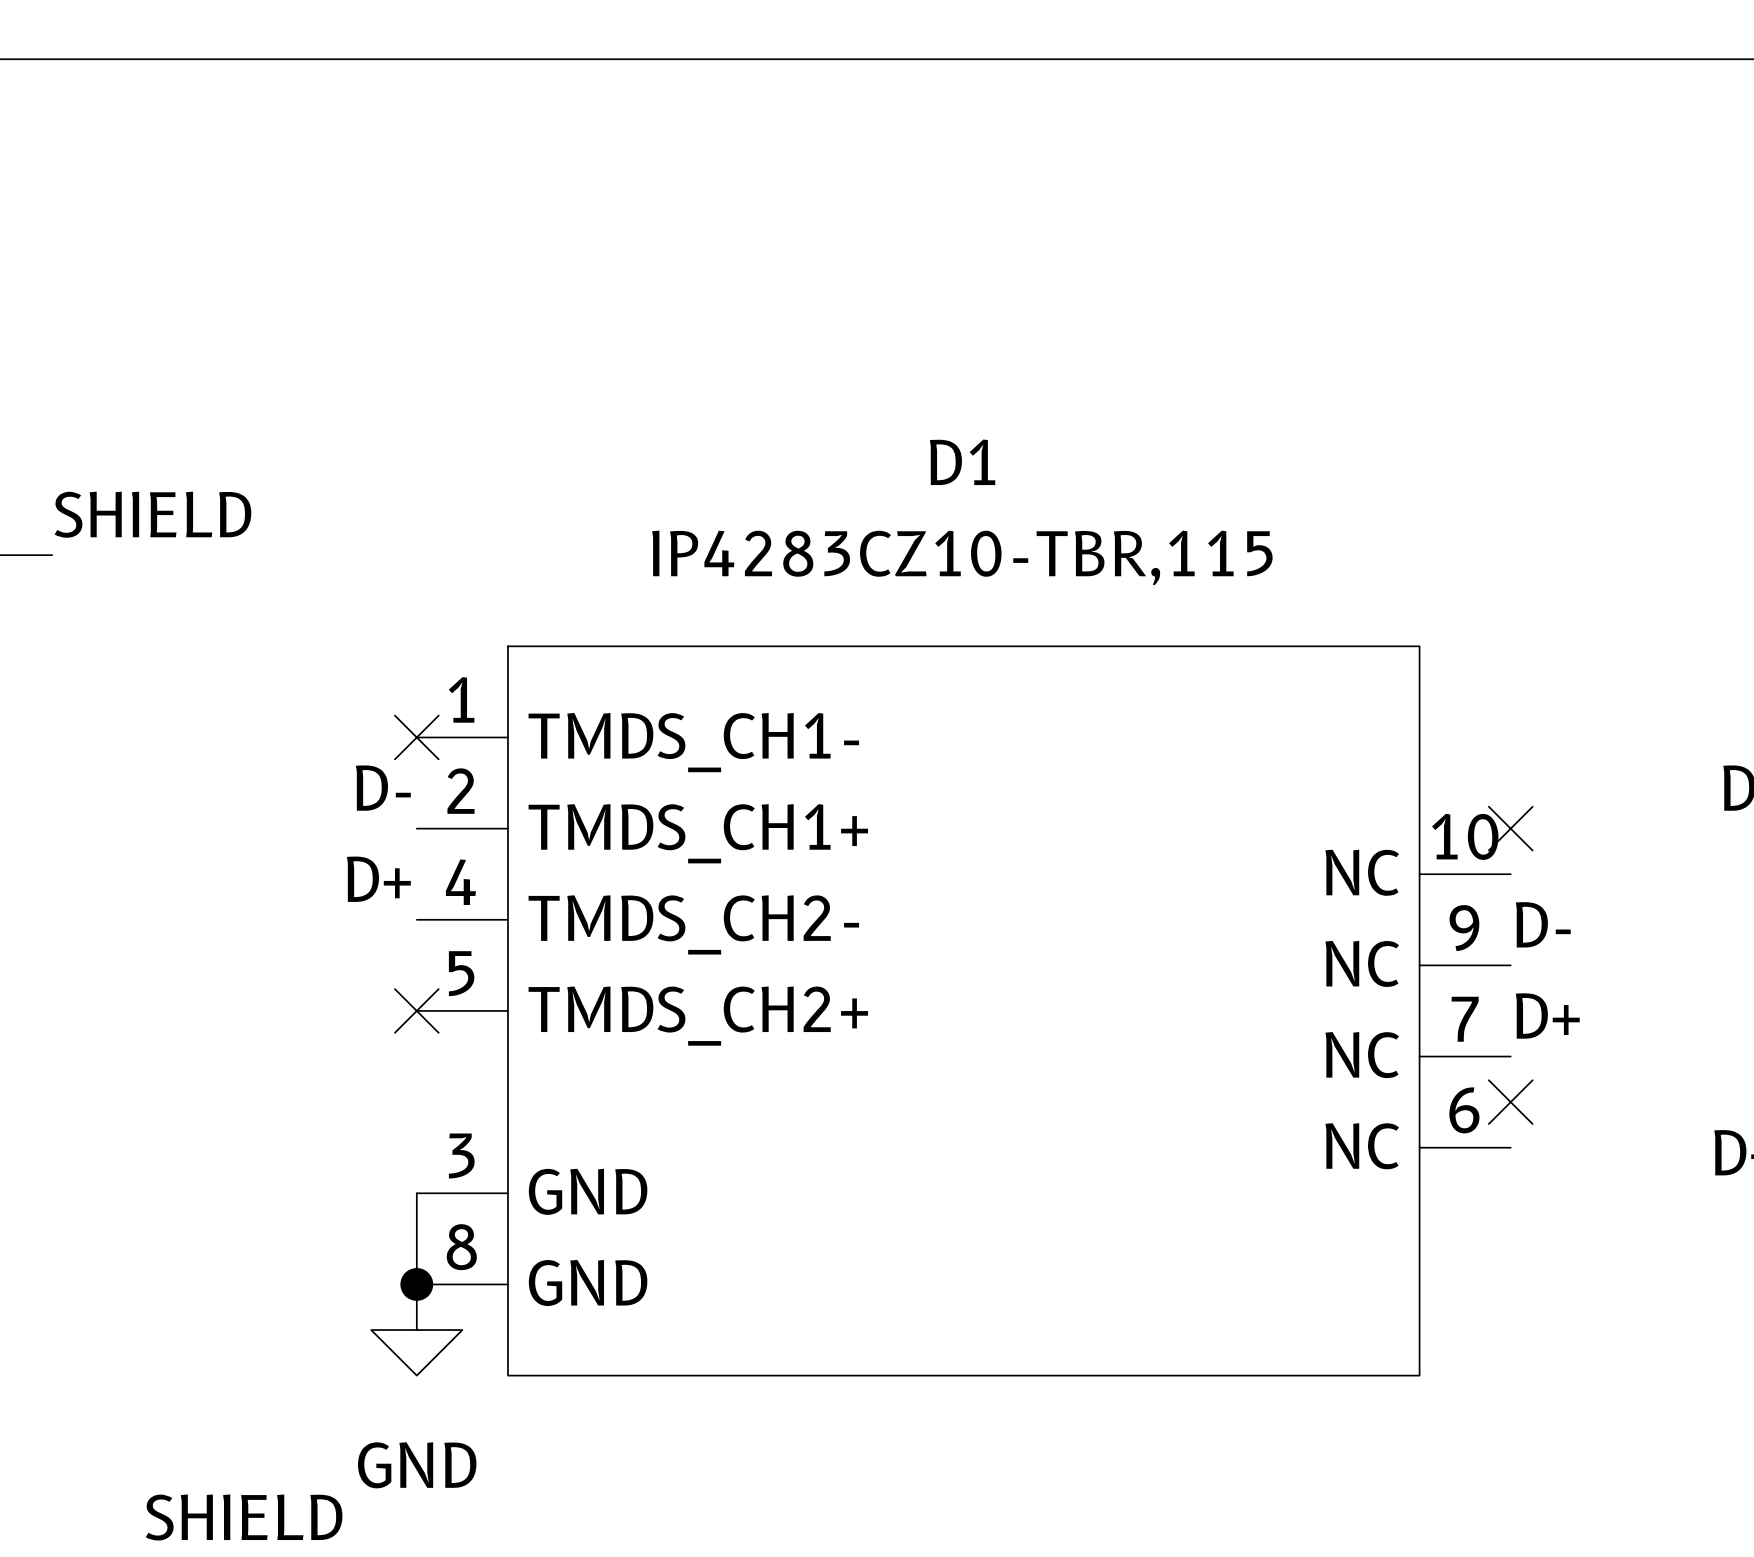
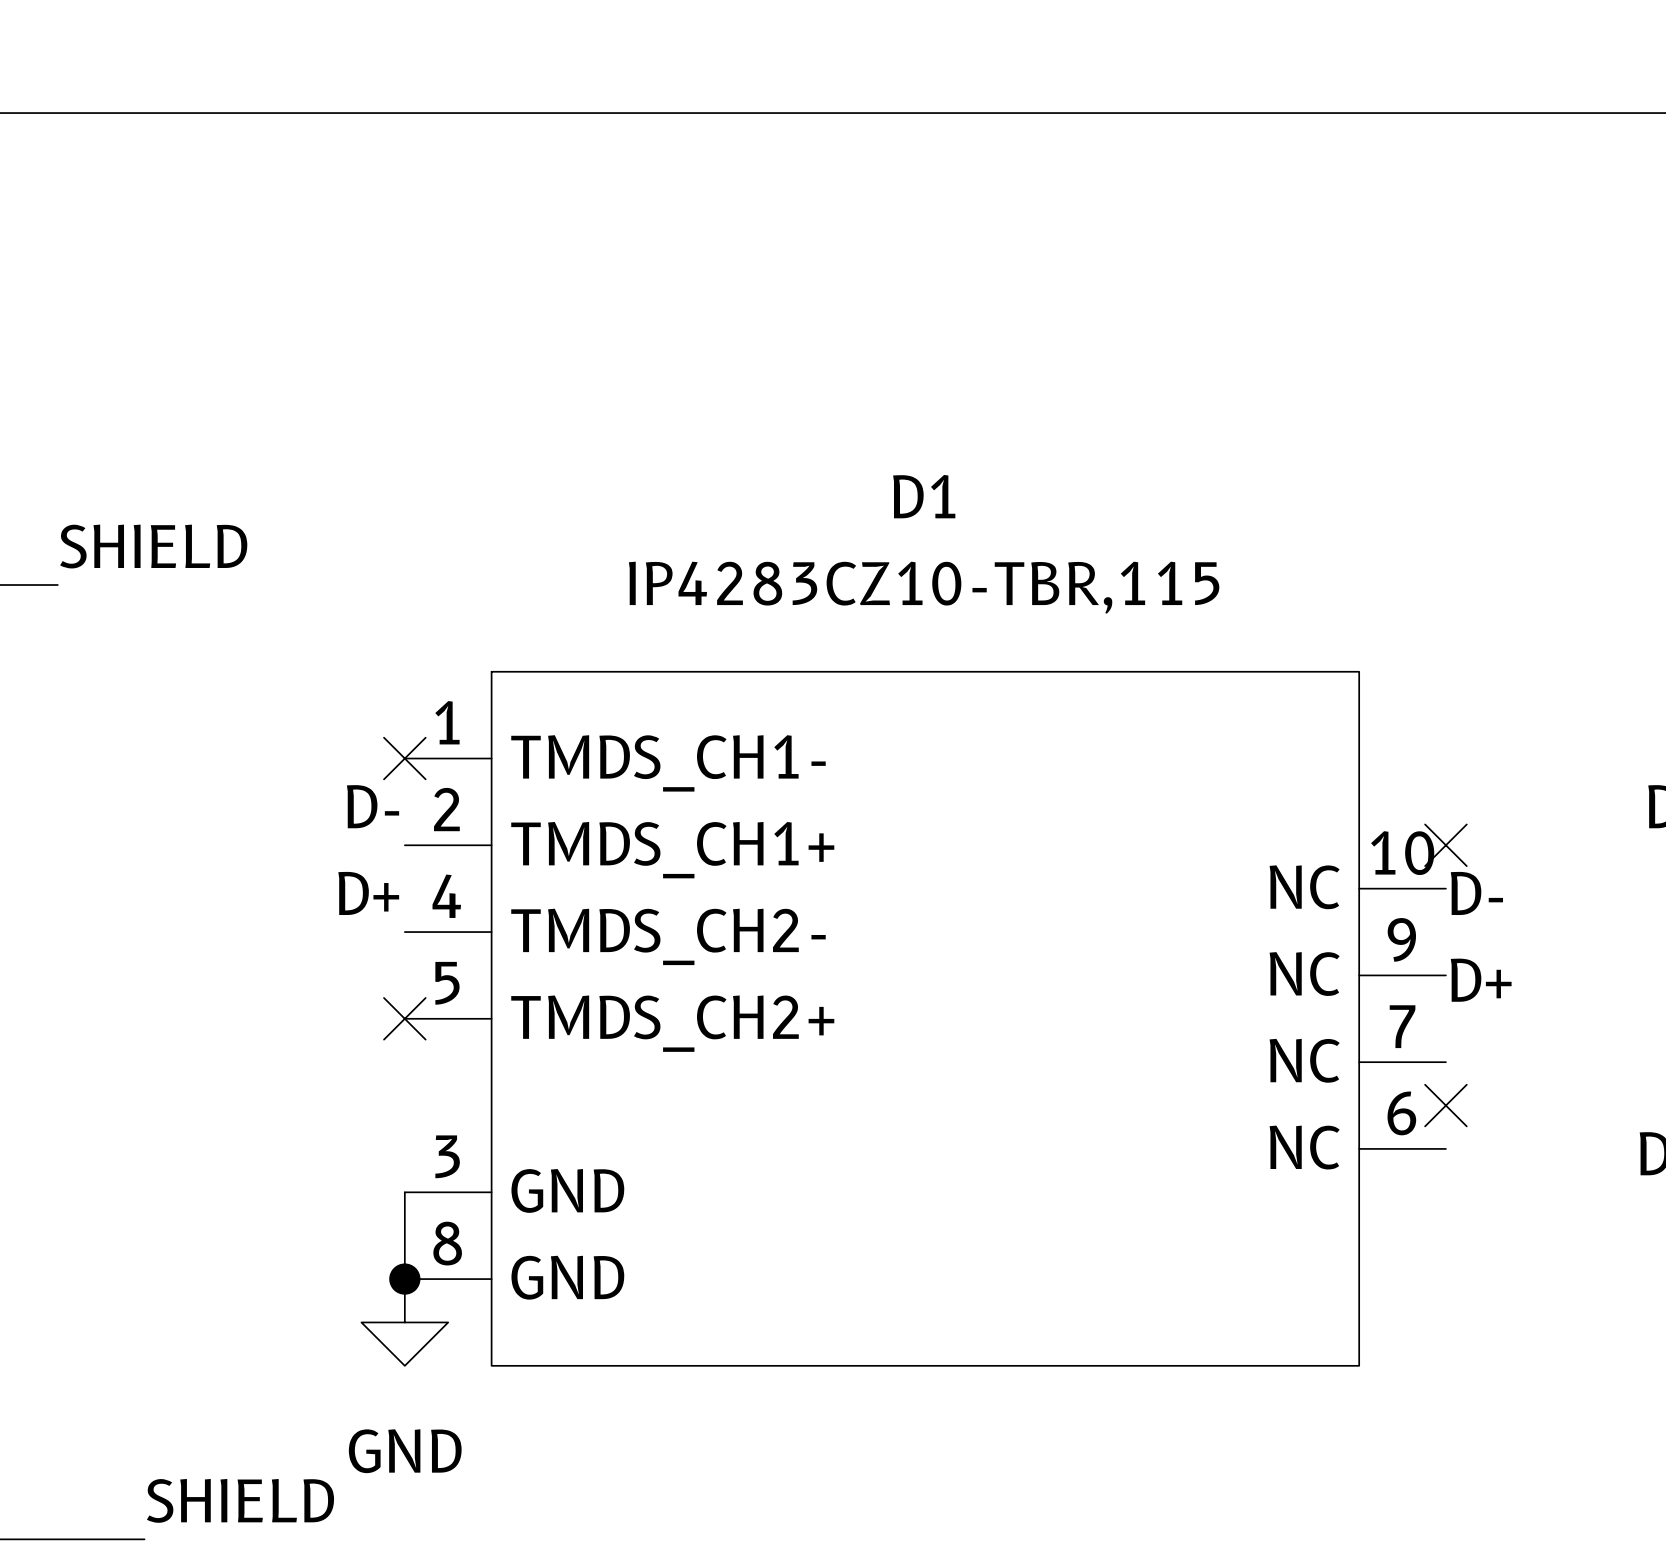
label position: D- (1543, 924) -> D- (1476, 893)
label position: D+ (1547, 1016) -> D+ (1481, 980)

